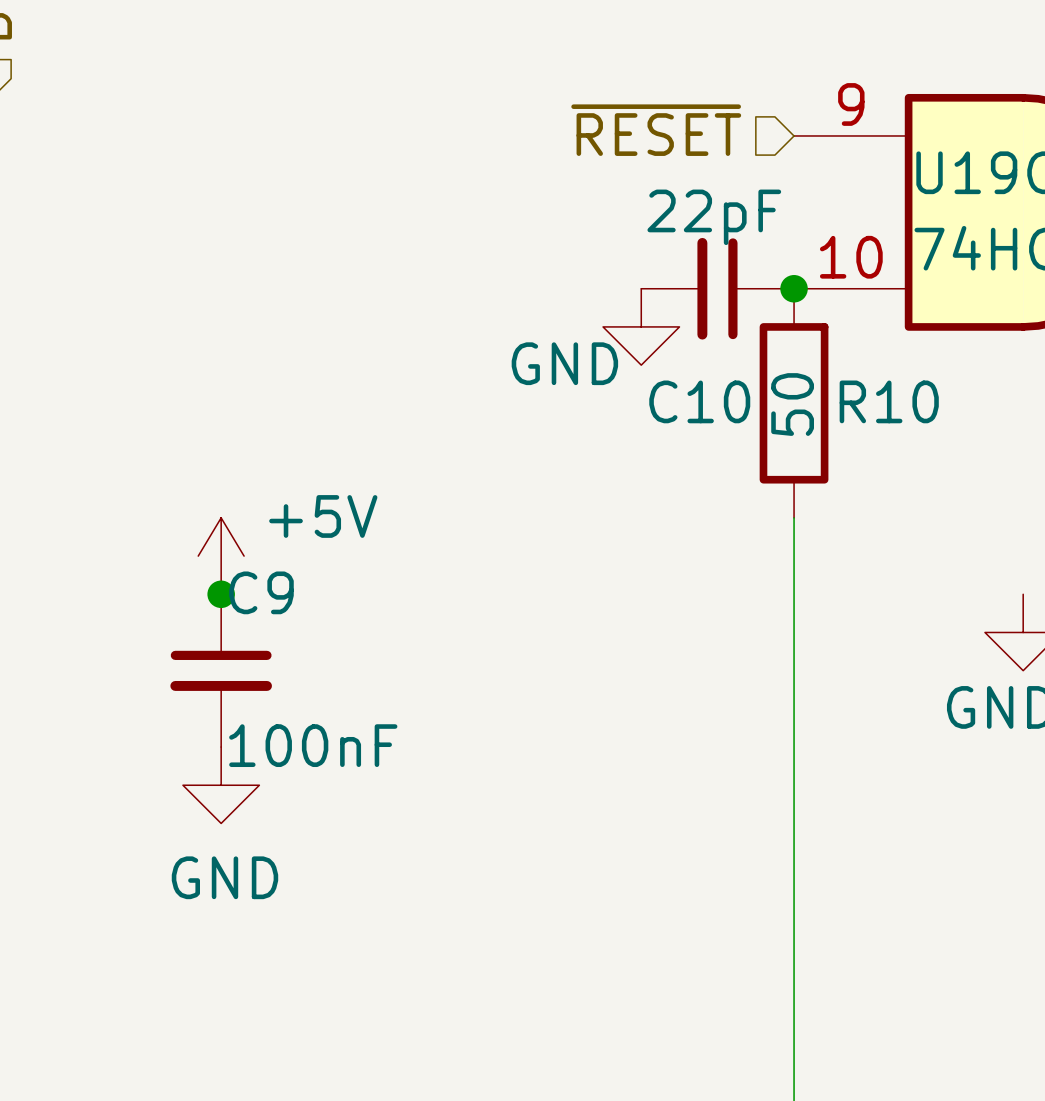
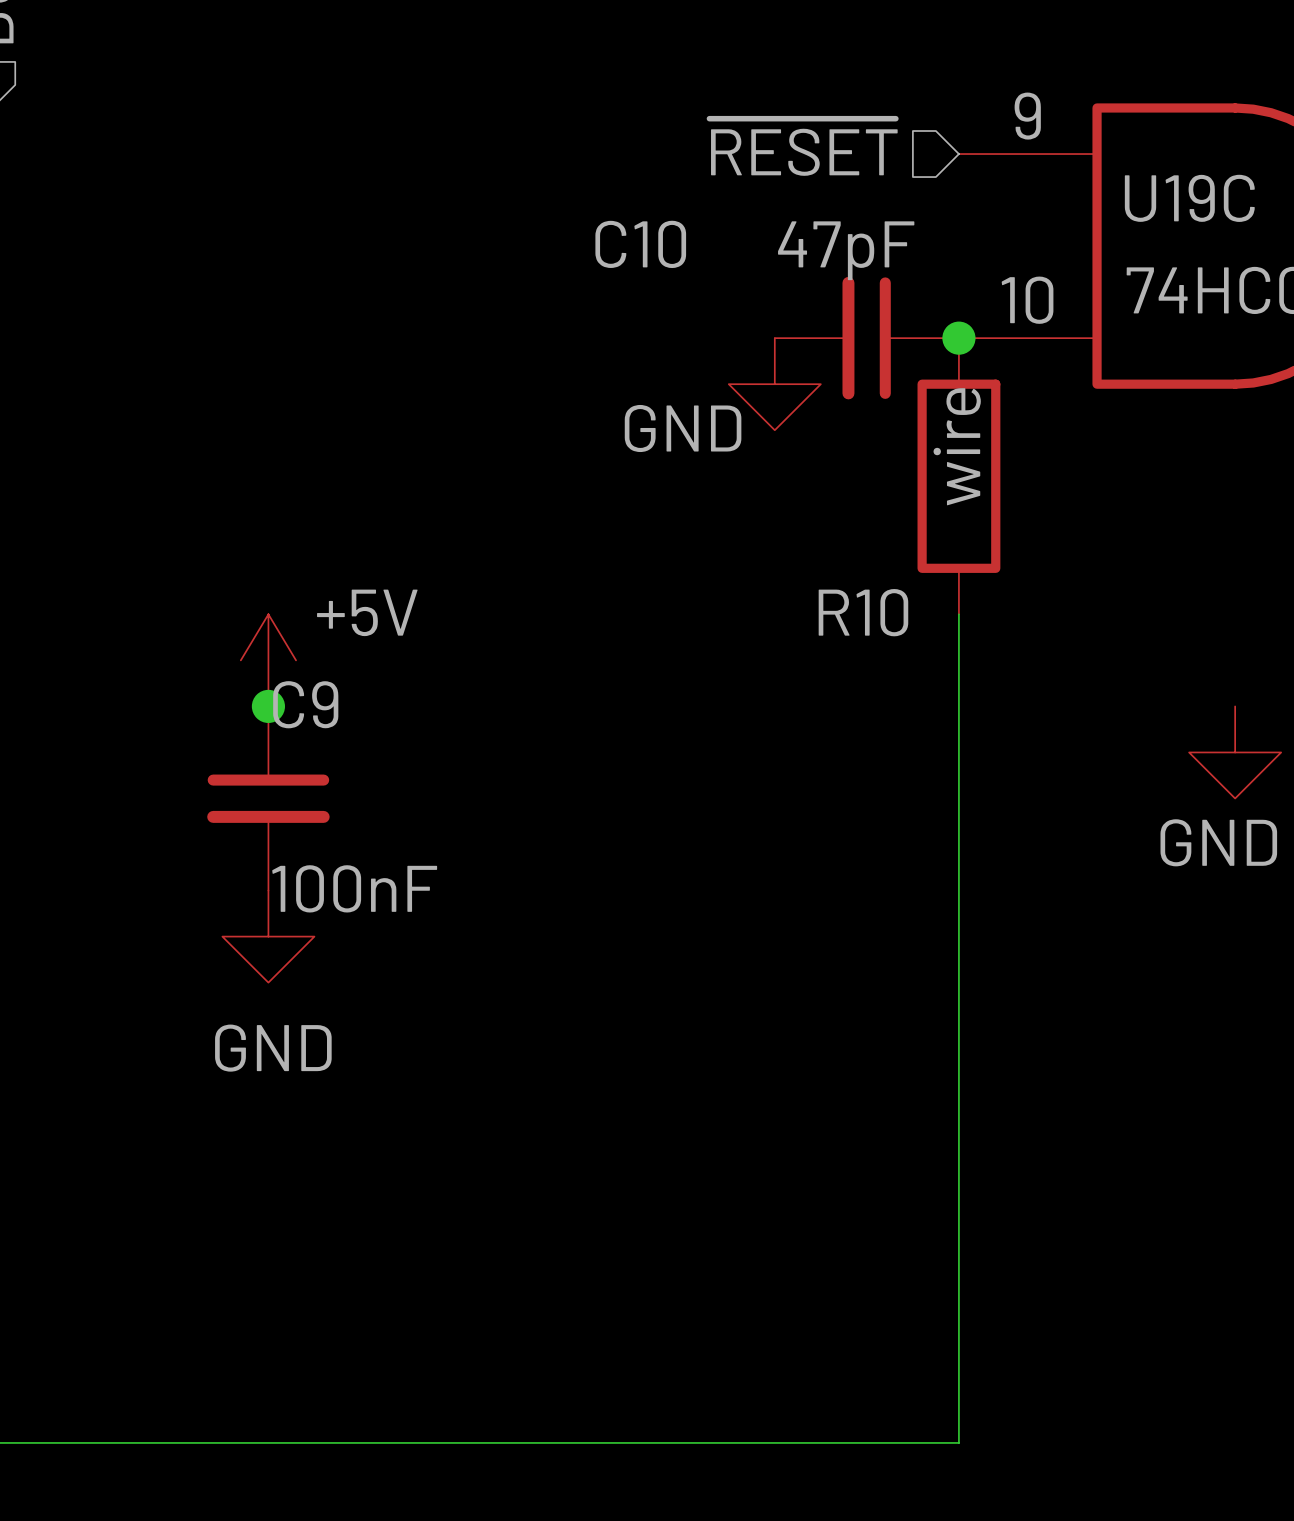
C10 value: 22pF (714, 217) -> 47pF (846, 250)
C10 name position: C10 (699, 401) -> C10 (640, 244)
R10 name position: R10 (889, 401) -> R10 (863, 612)
R10 value: 50 (792, 404) -> wire (957, 446)

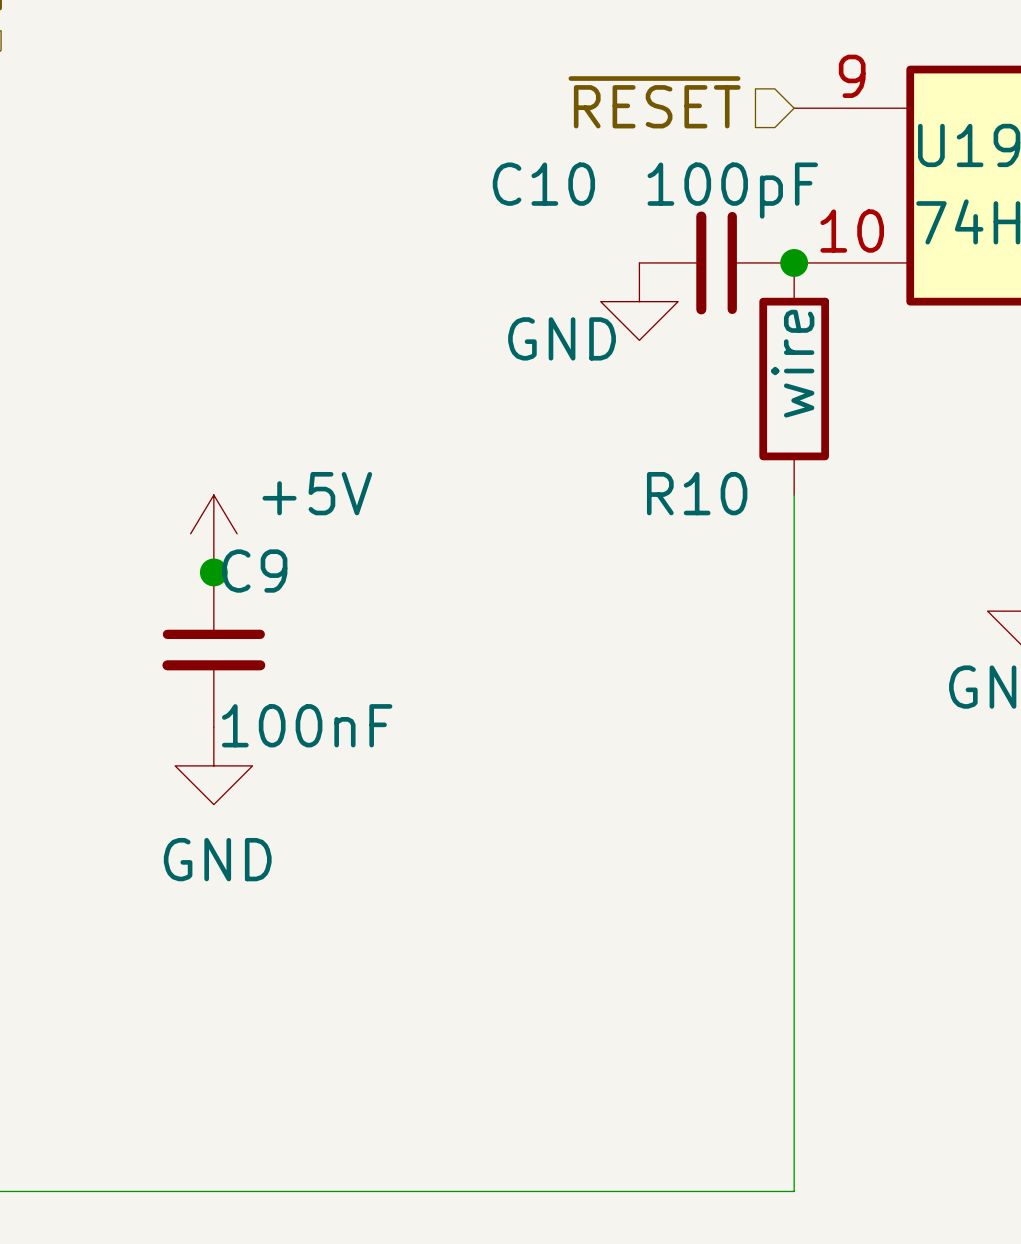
C10 value: 47pF (846, 250) -> 100pF (732, 190)

